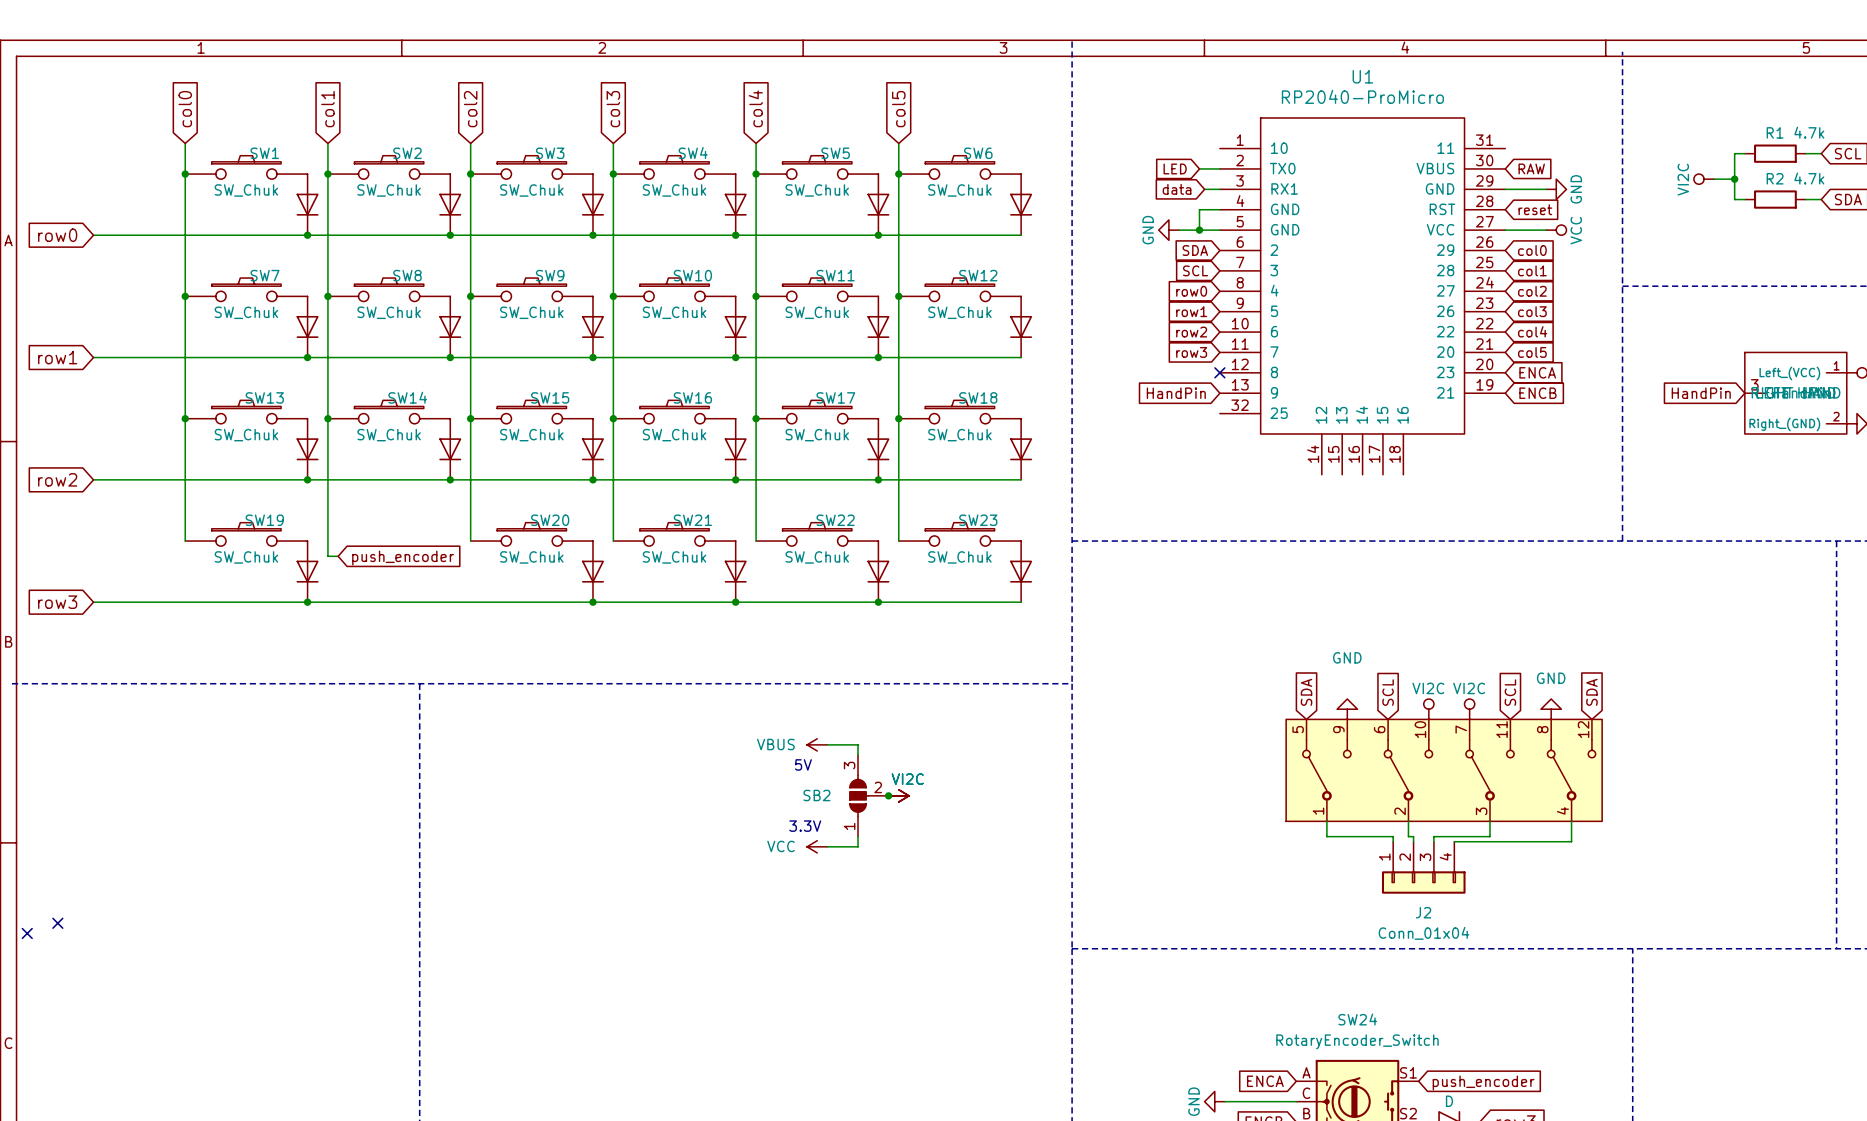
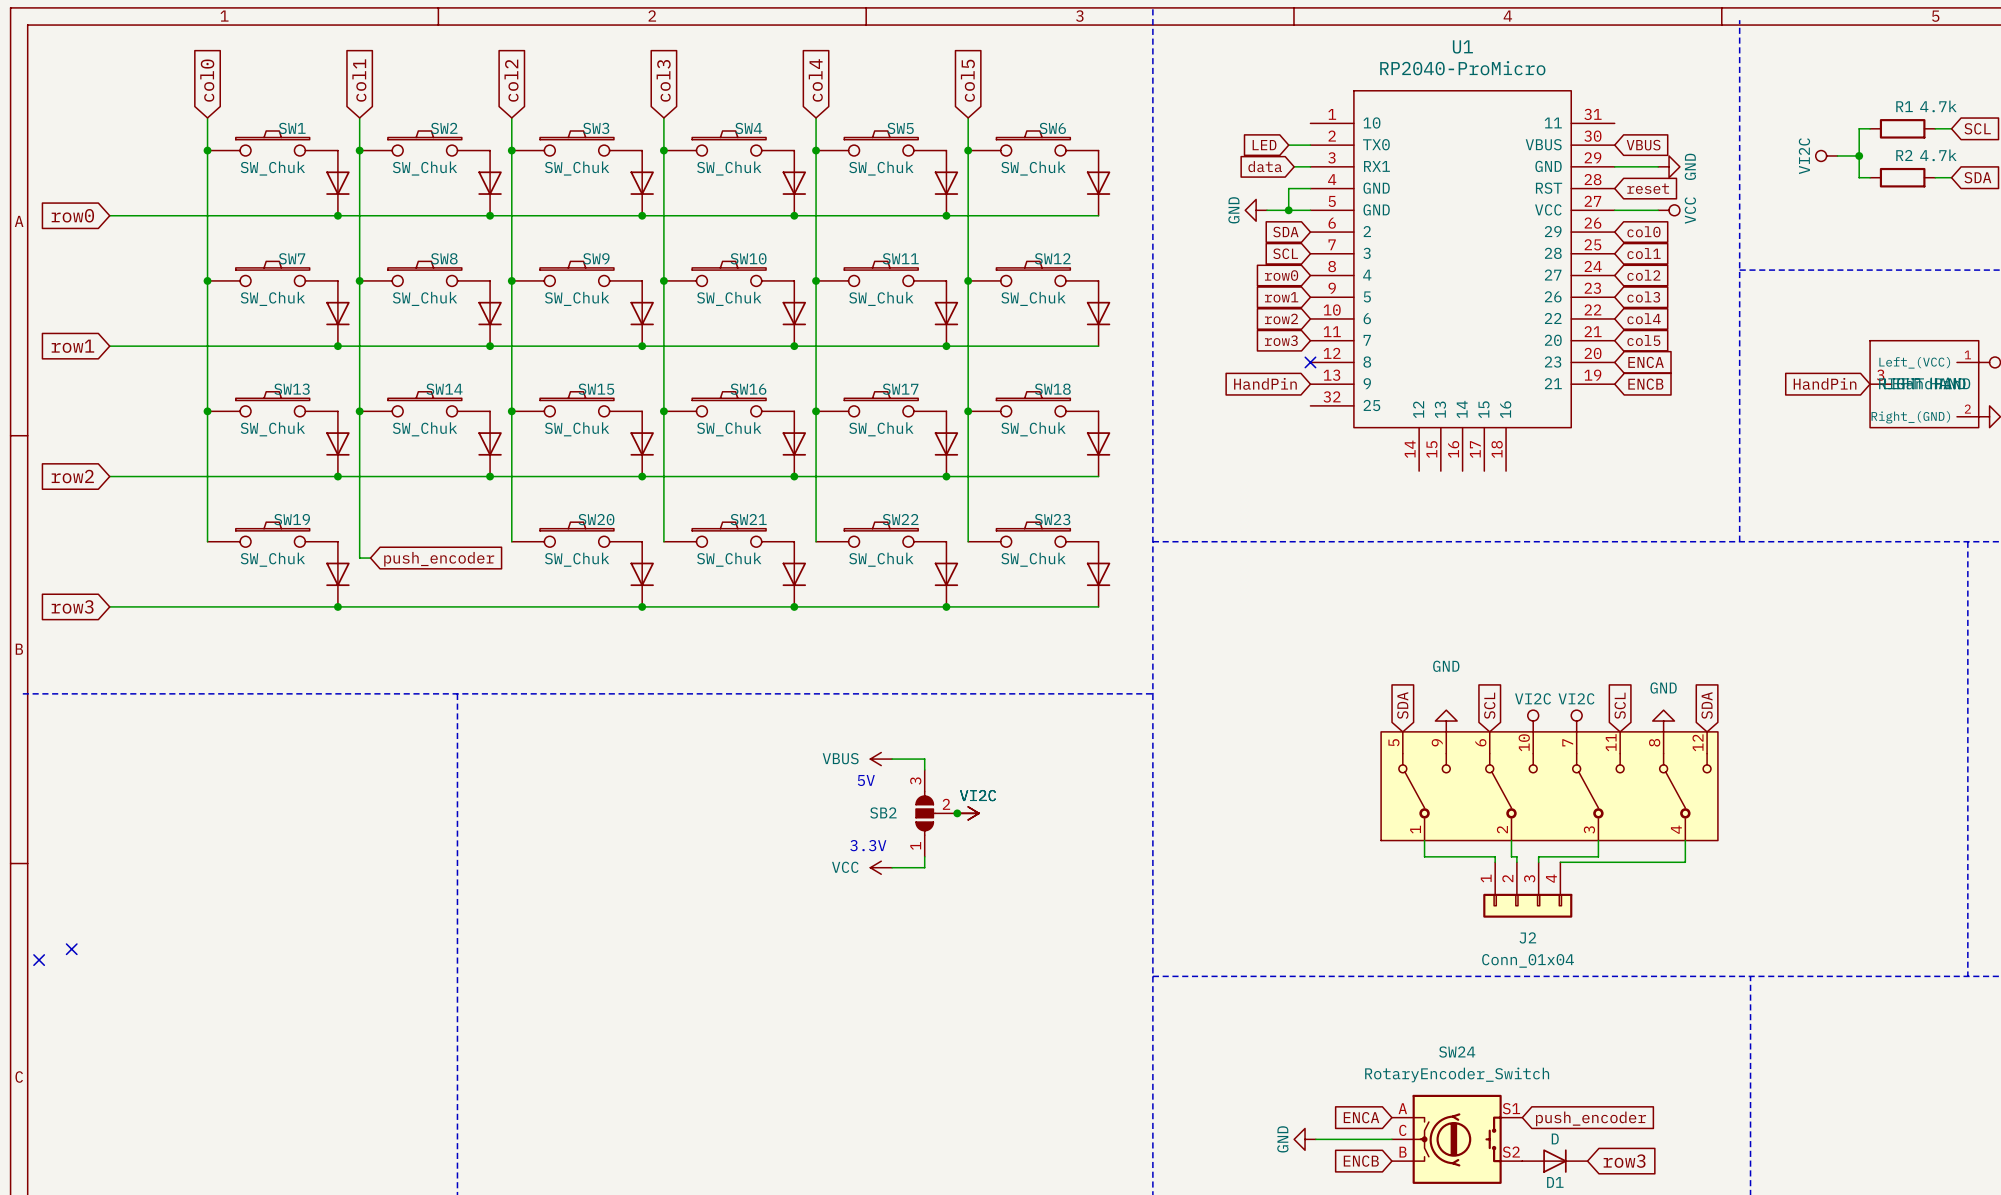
global label: RAW (1531, 168) -> VBUS (1643, 145)

